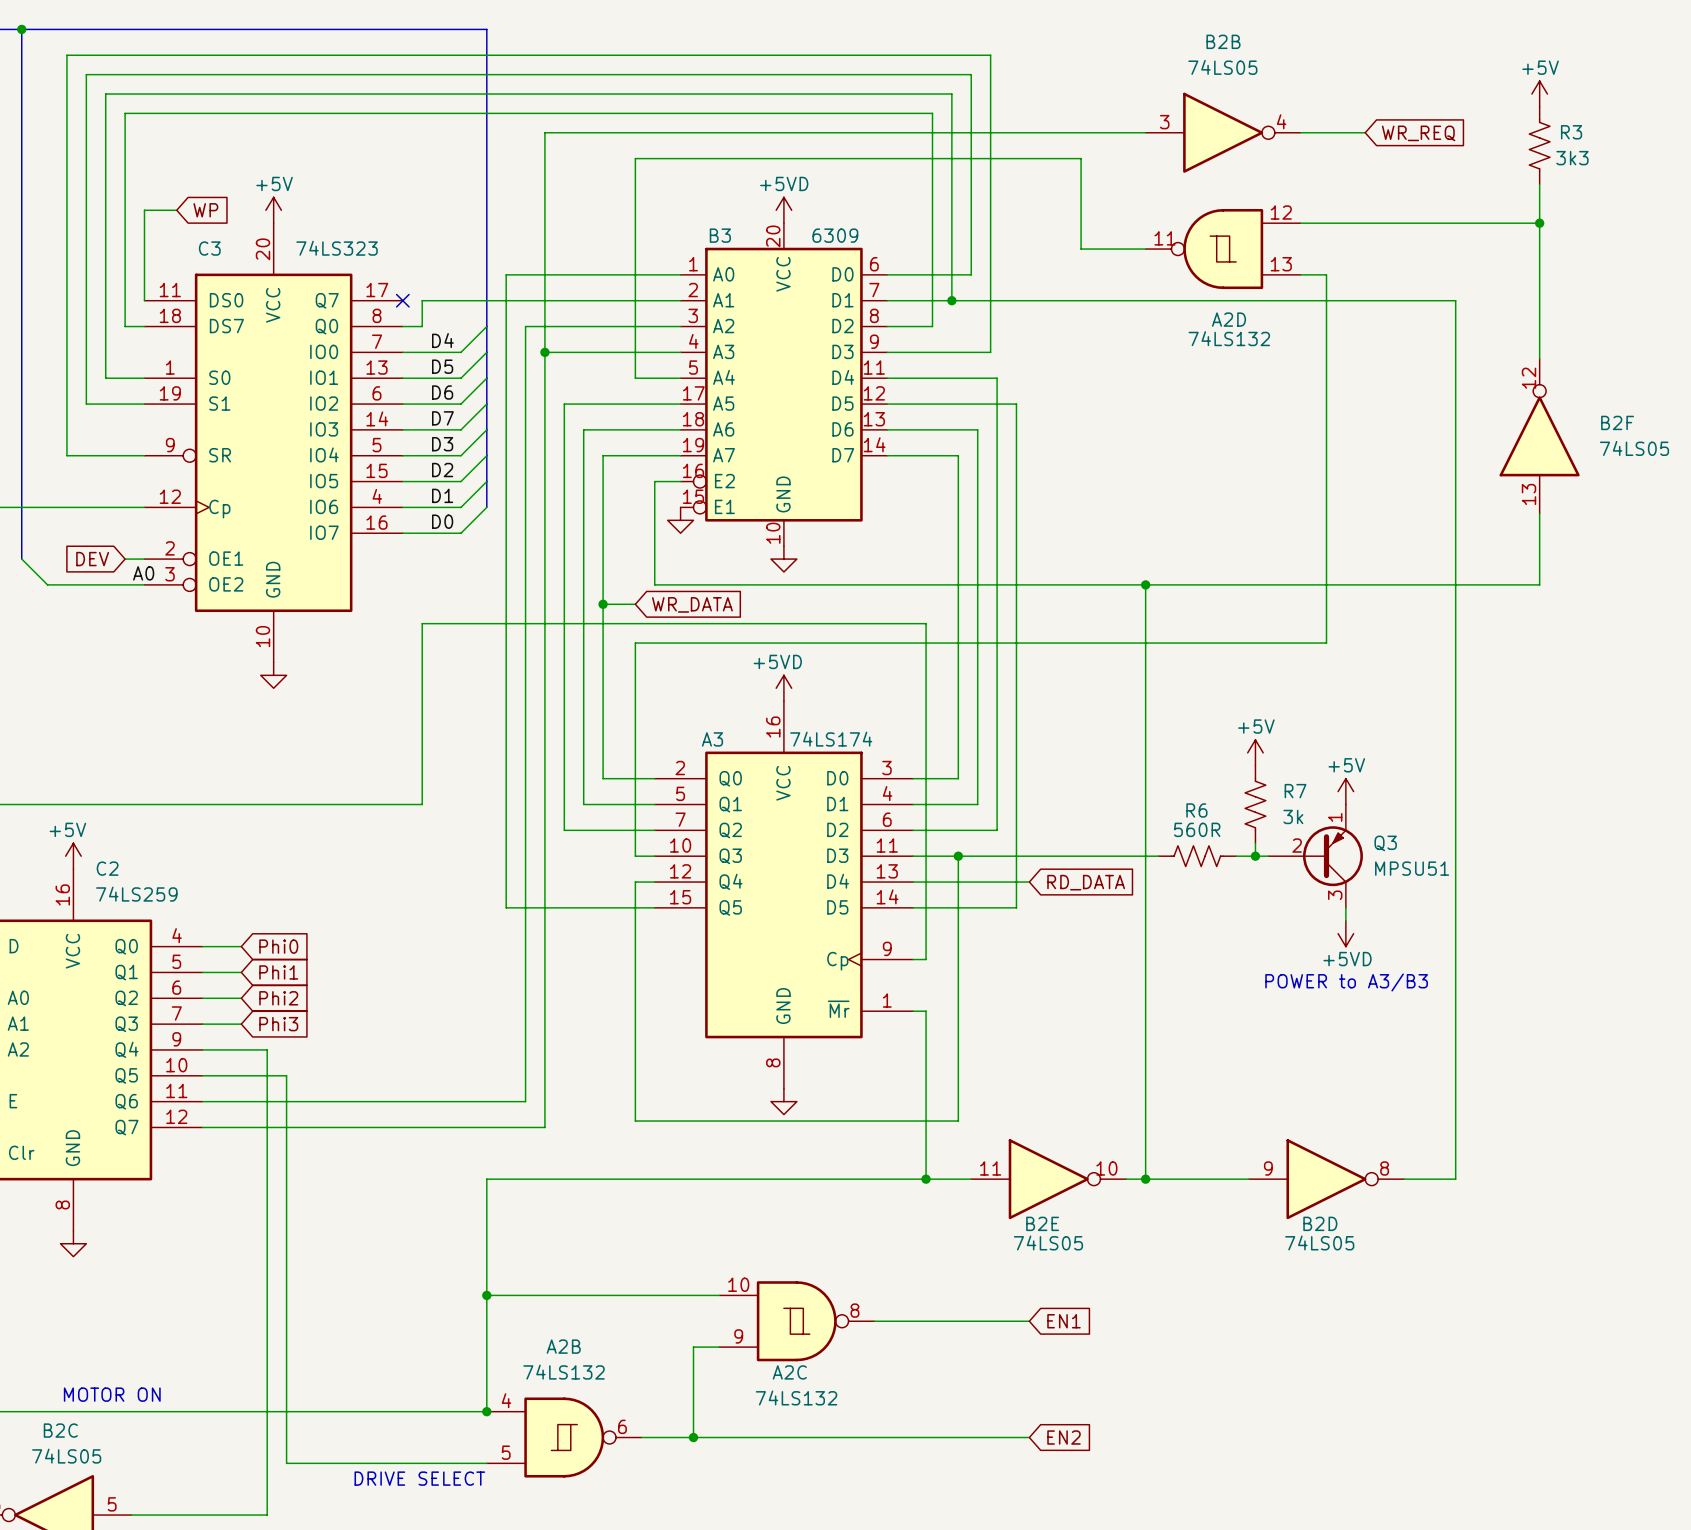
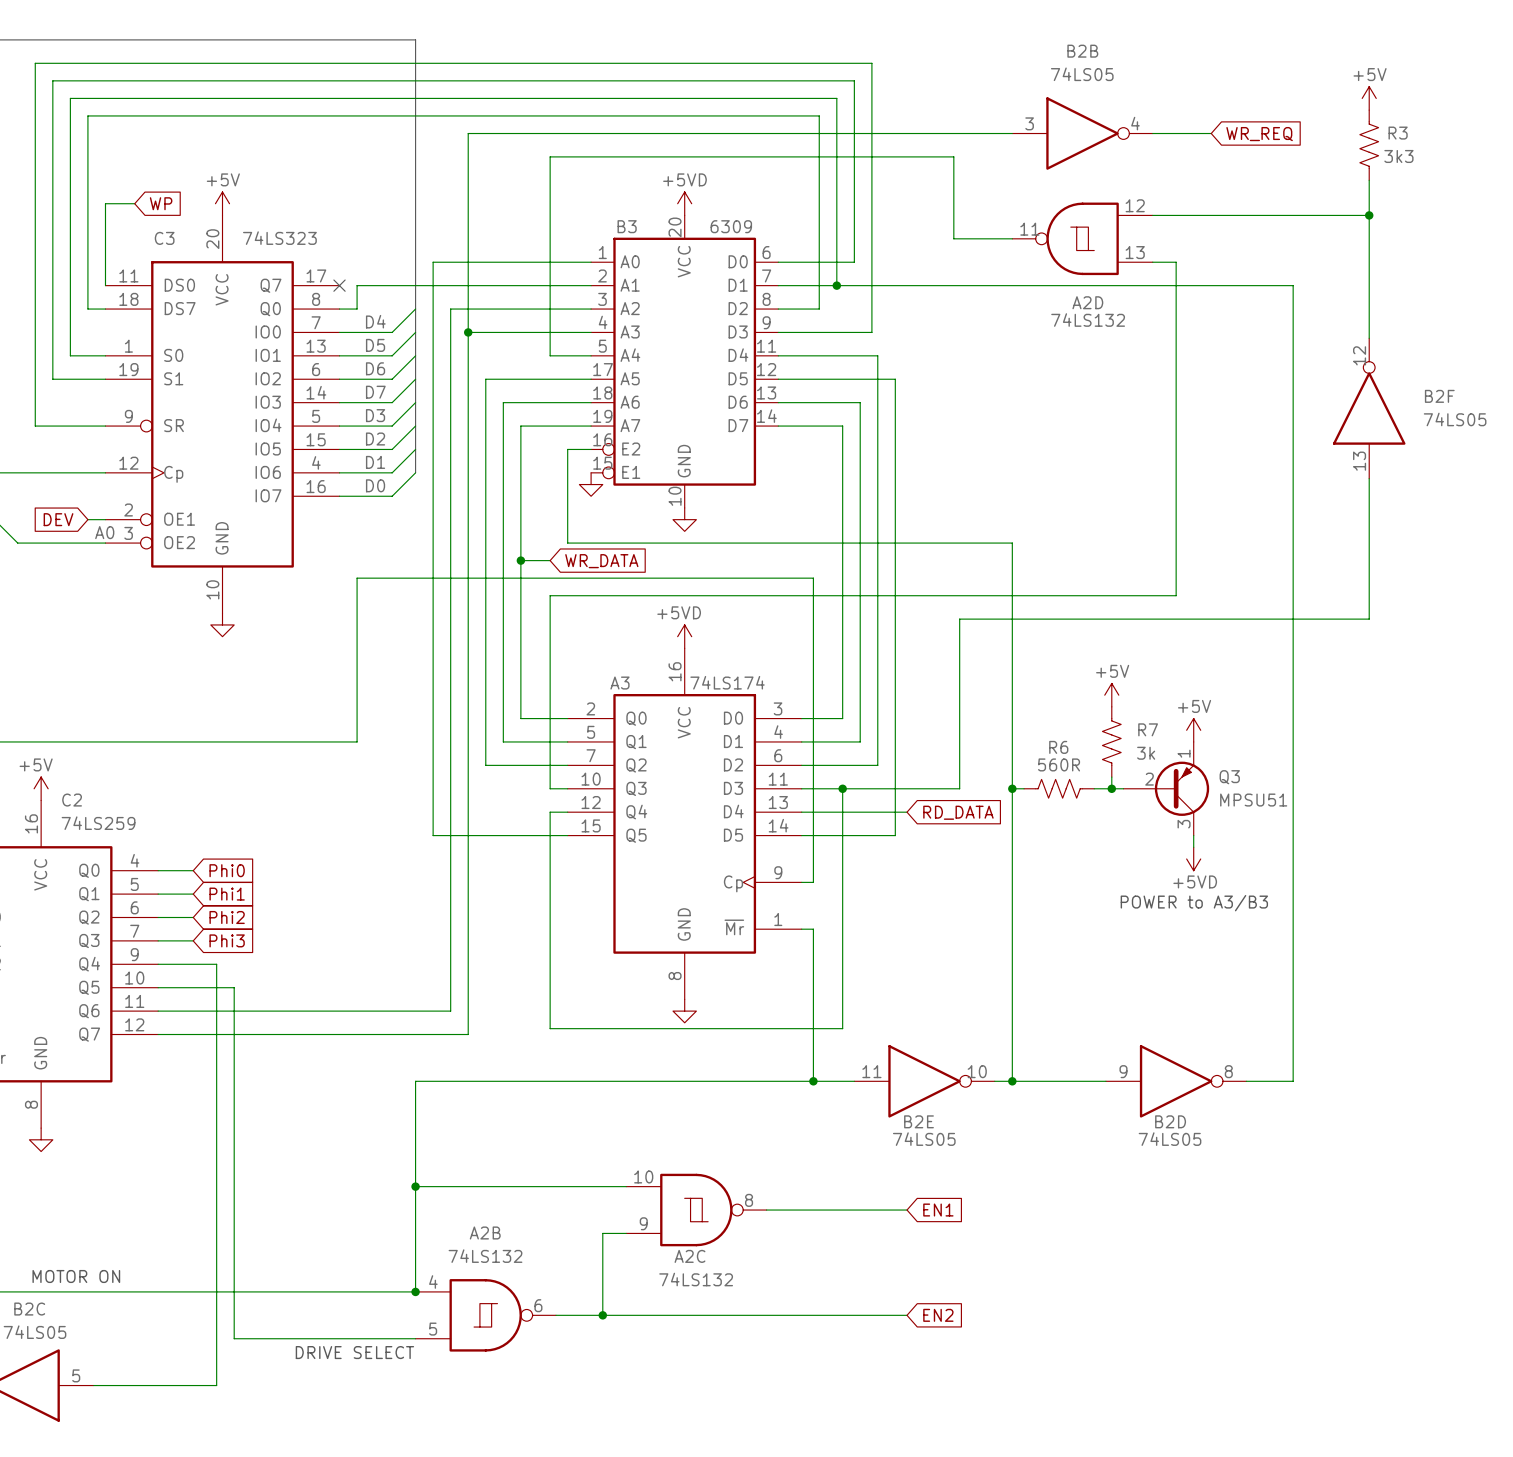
wire: (1145, 584) (1539, 584) -> (959, 788) (959, 619) (1369, 619) (1369, 543)
junction: (1145, 584) -> none
wire: (1087, 856) (1145, 856) -> none
junction: none -> (1012, 788)

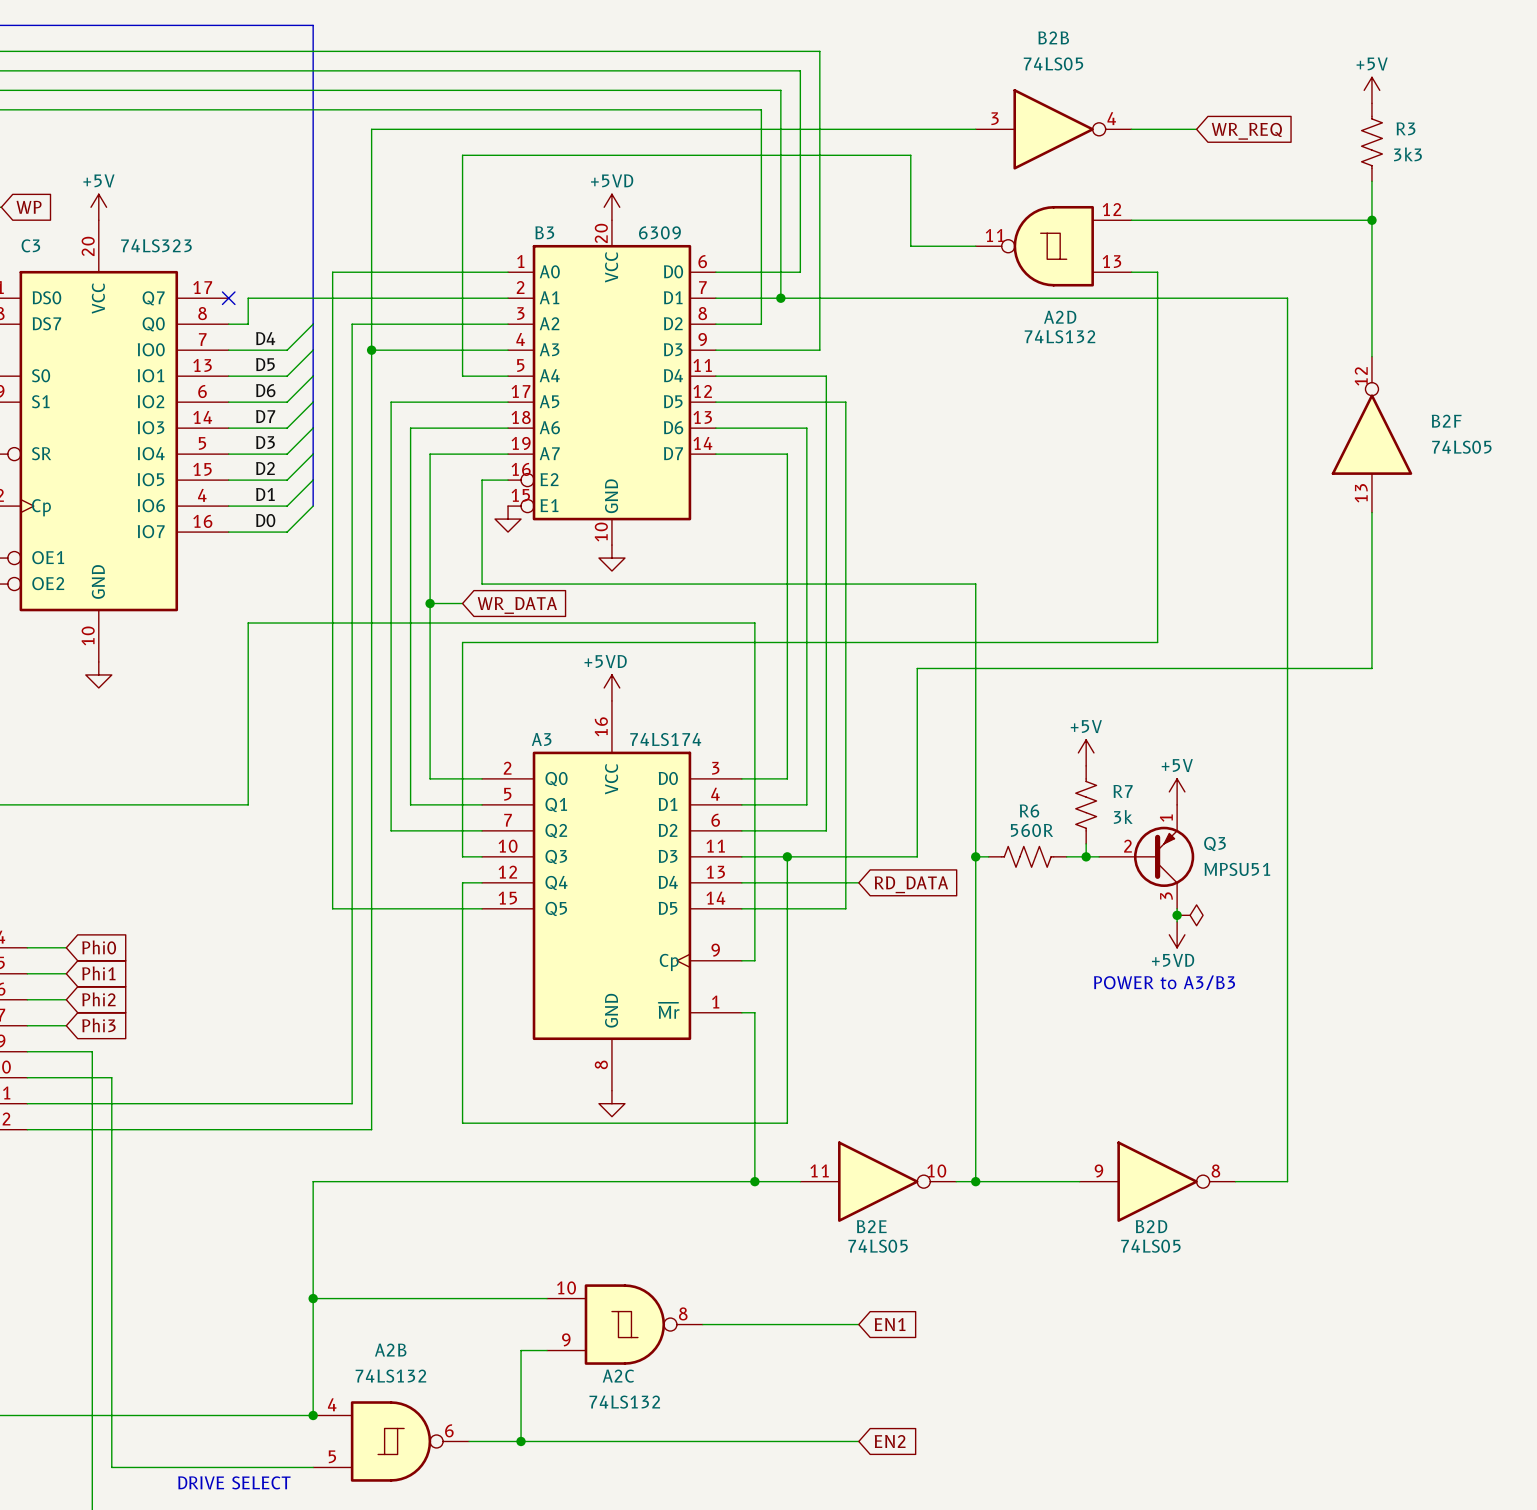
junction: none -> (1177, 915)
power symbol: none -> (1190, 915)

